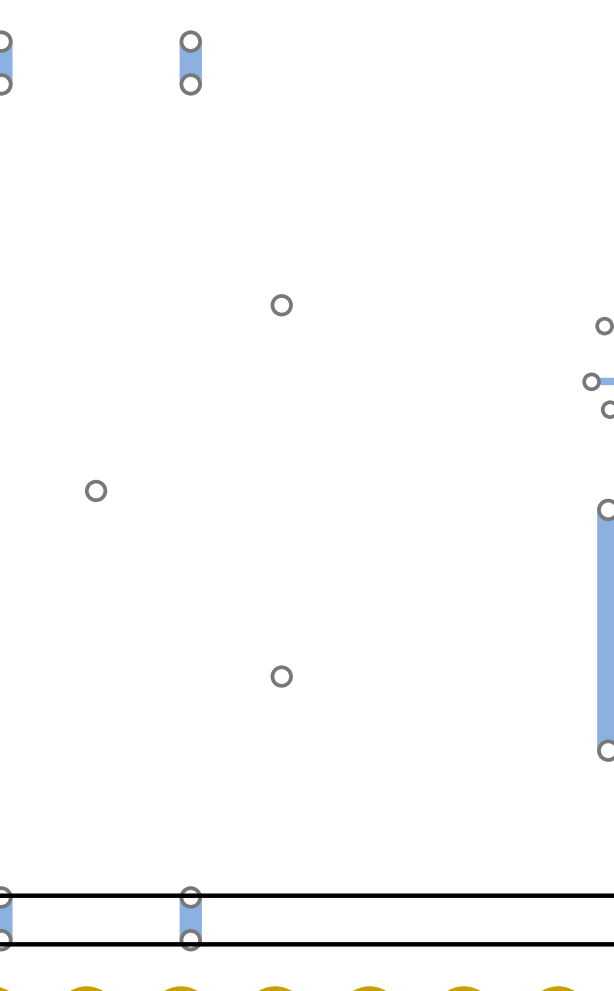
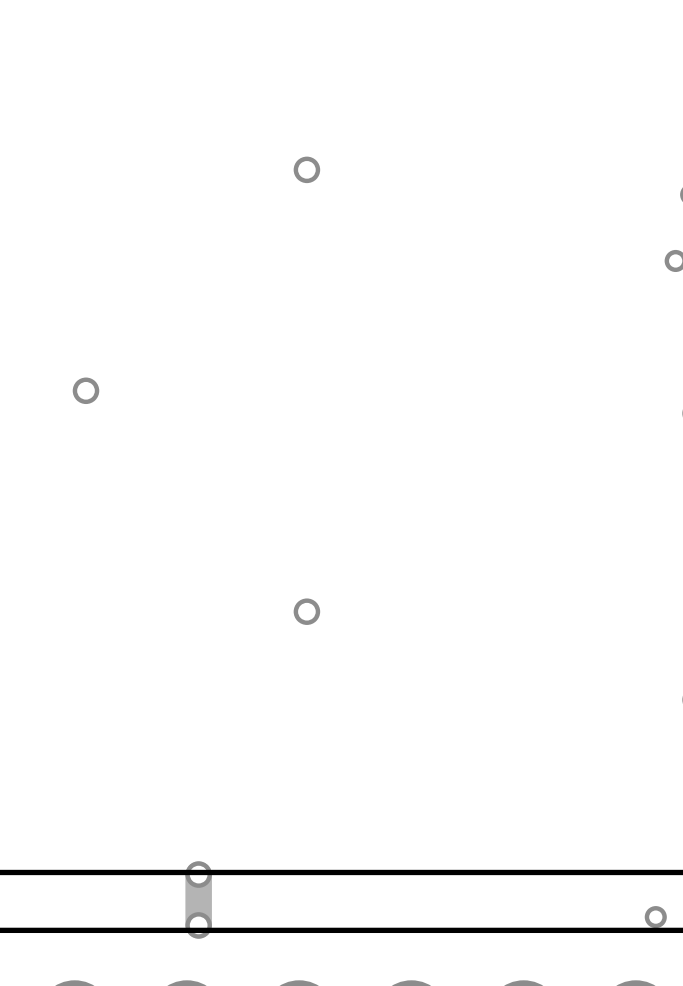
via: none -> (655, 917)

